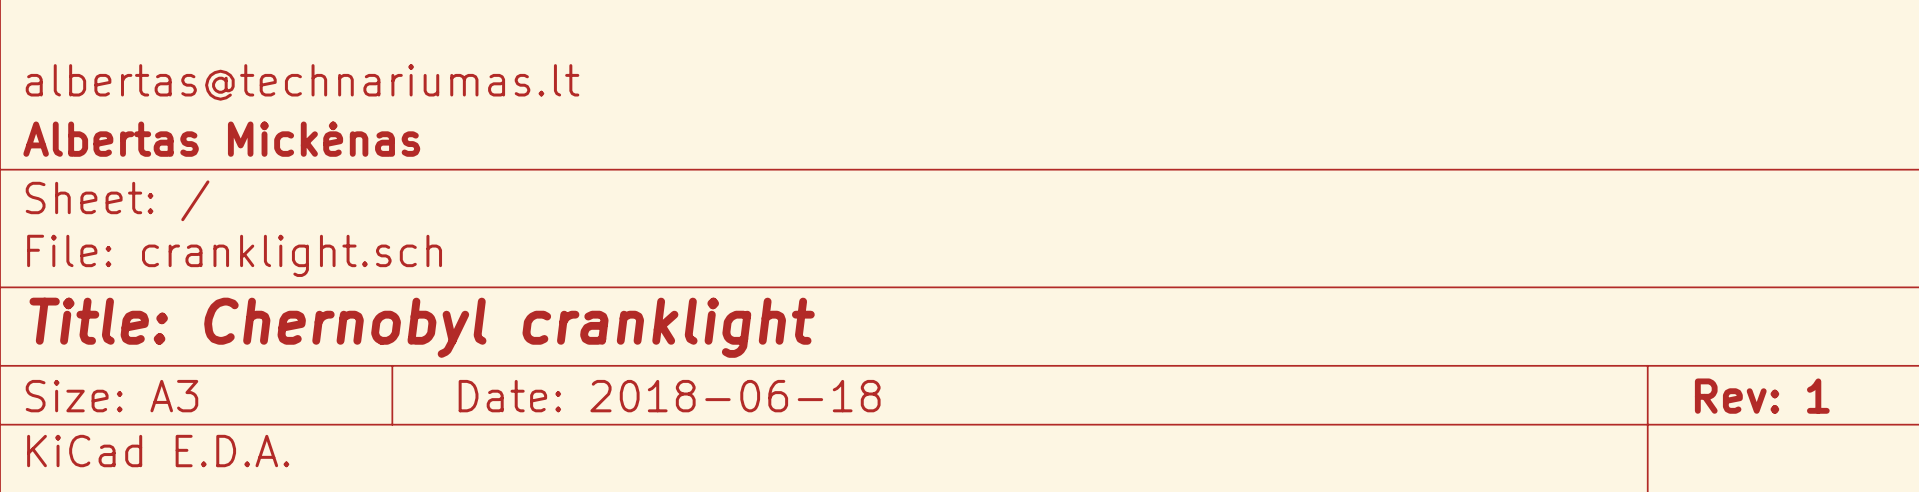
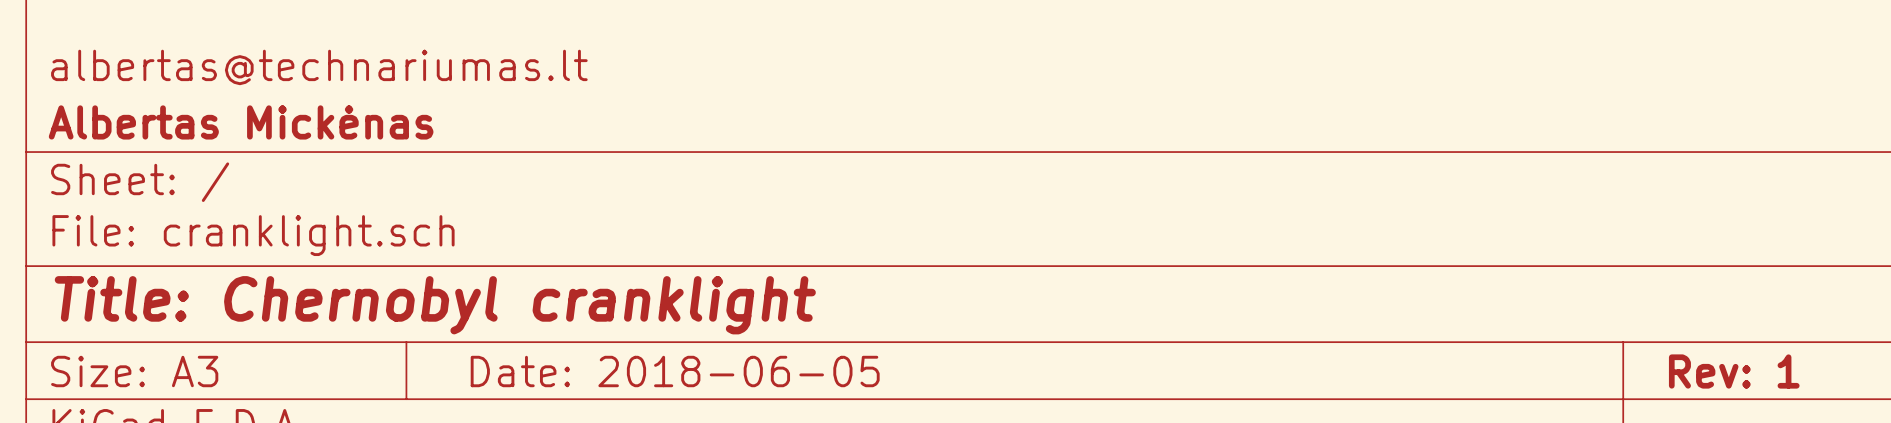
title block: Date: 2018-06-18 (669, 396) -> Date: 2018-06-05 (675, 371)

